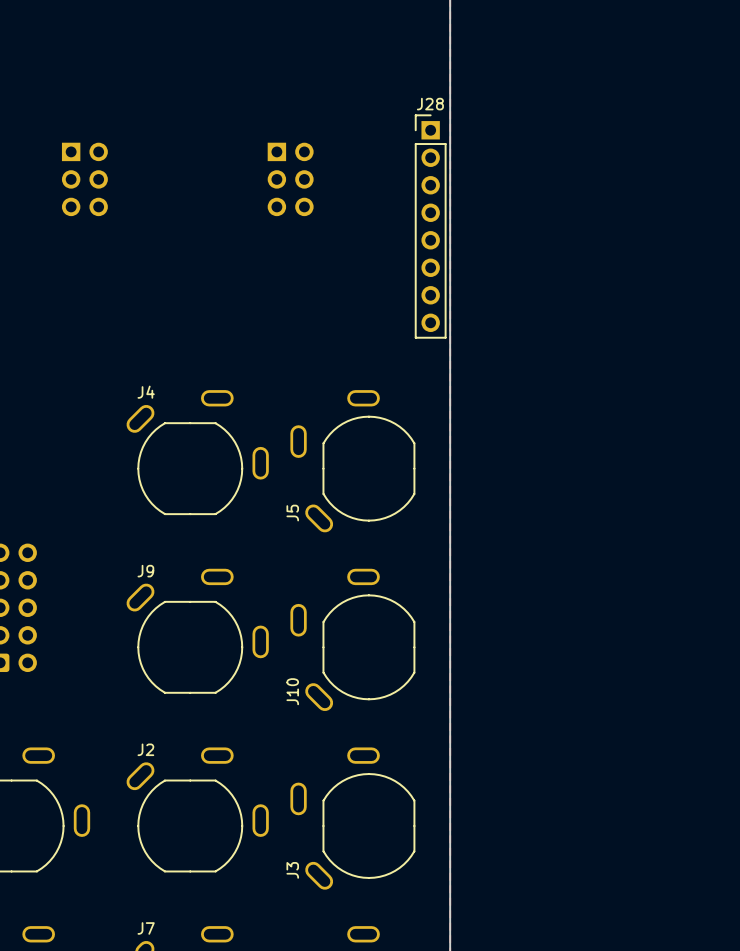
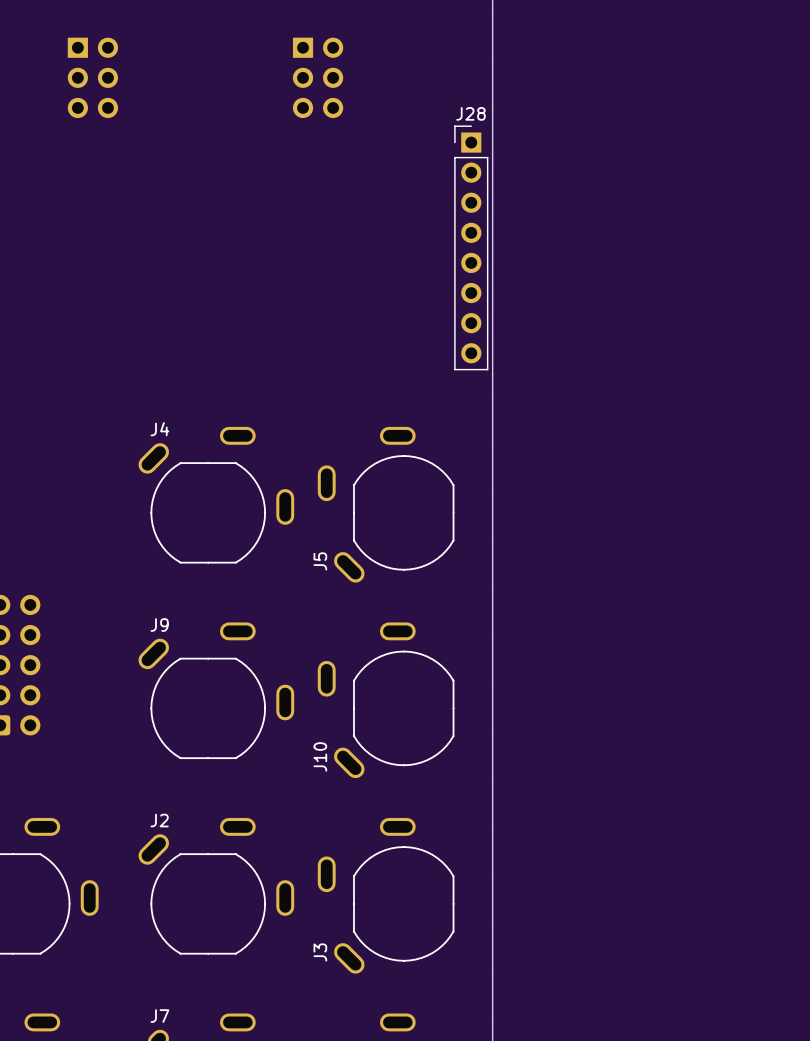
part position: (84, 179) -> (92, 77)
part position: (290, 179) -> (318, 77)

